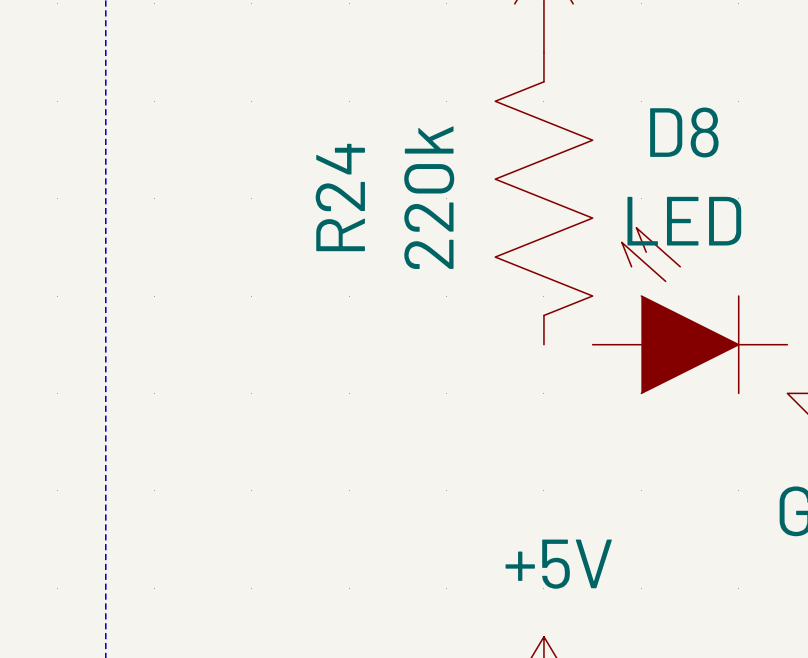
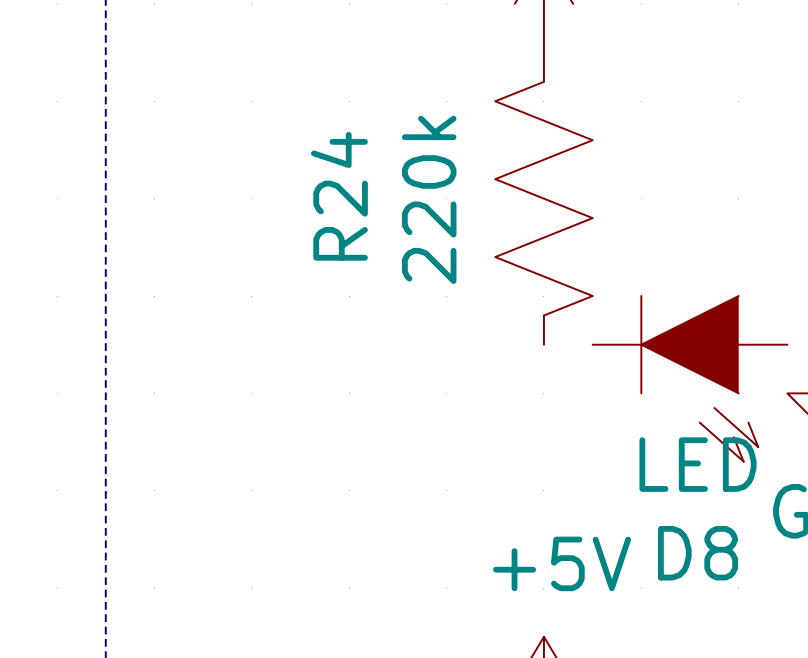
D8 rotation: 0° (680, 310) -> 180° (699, 378)

